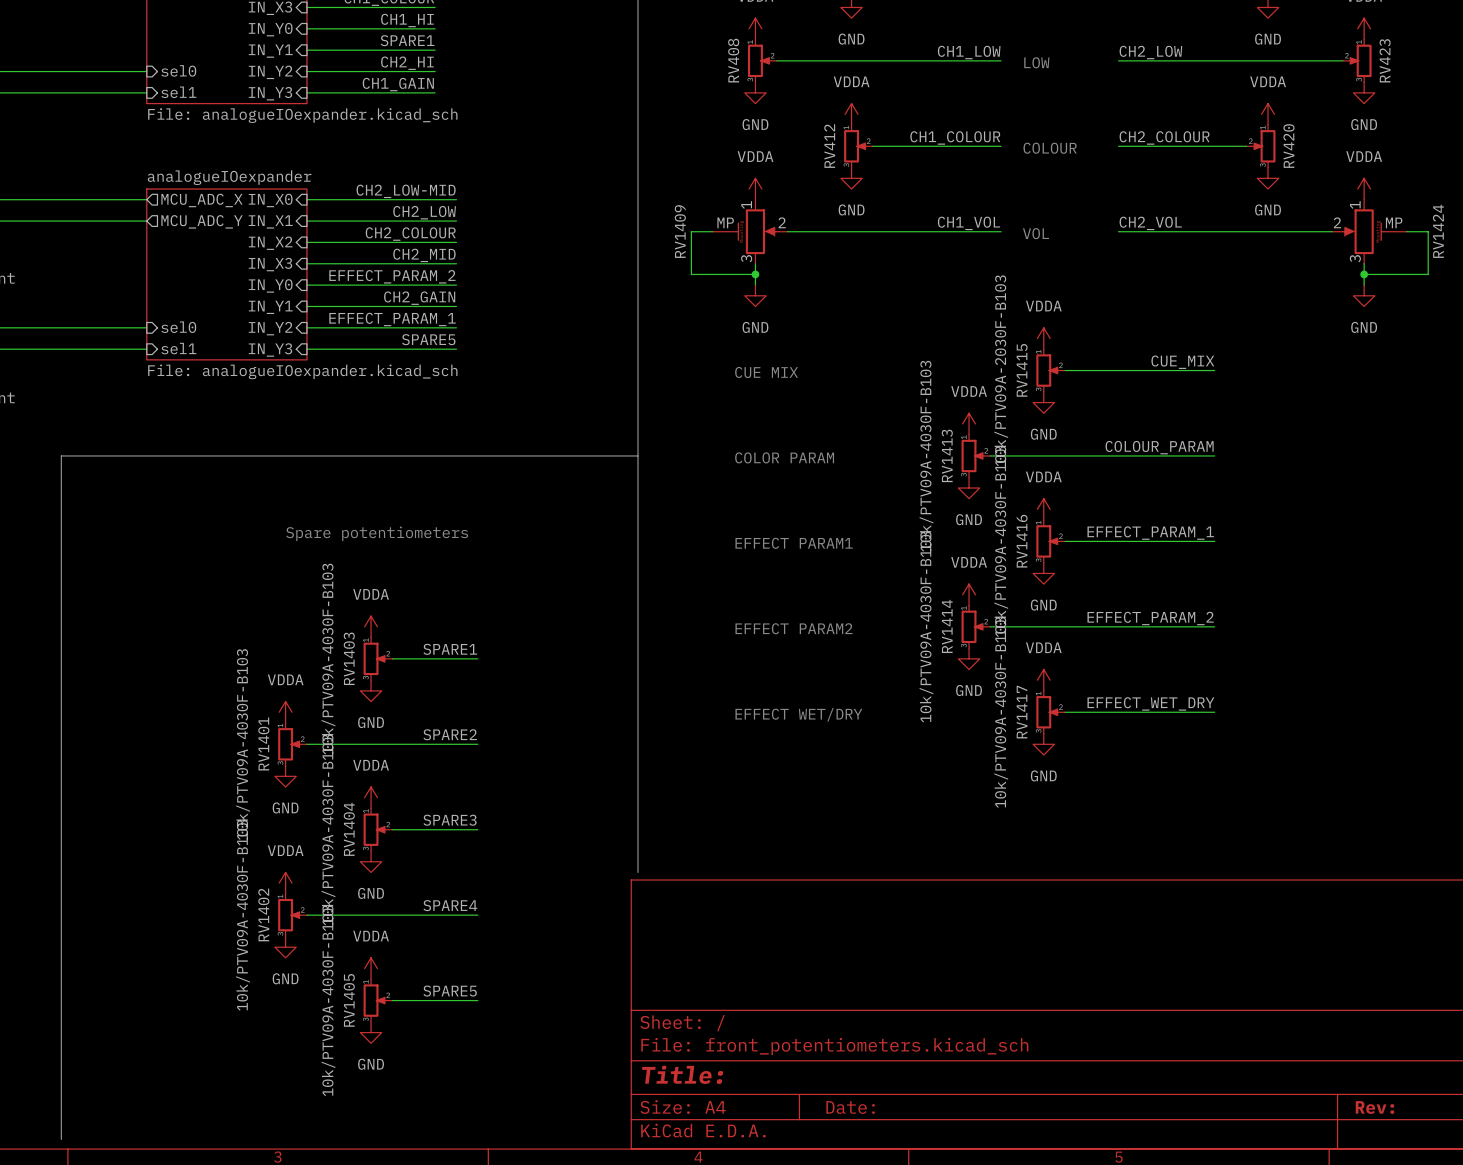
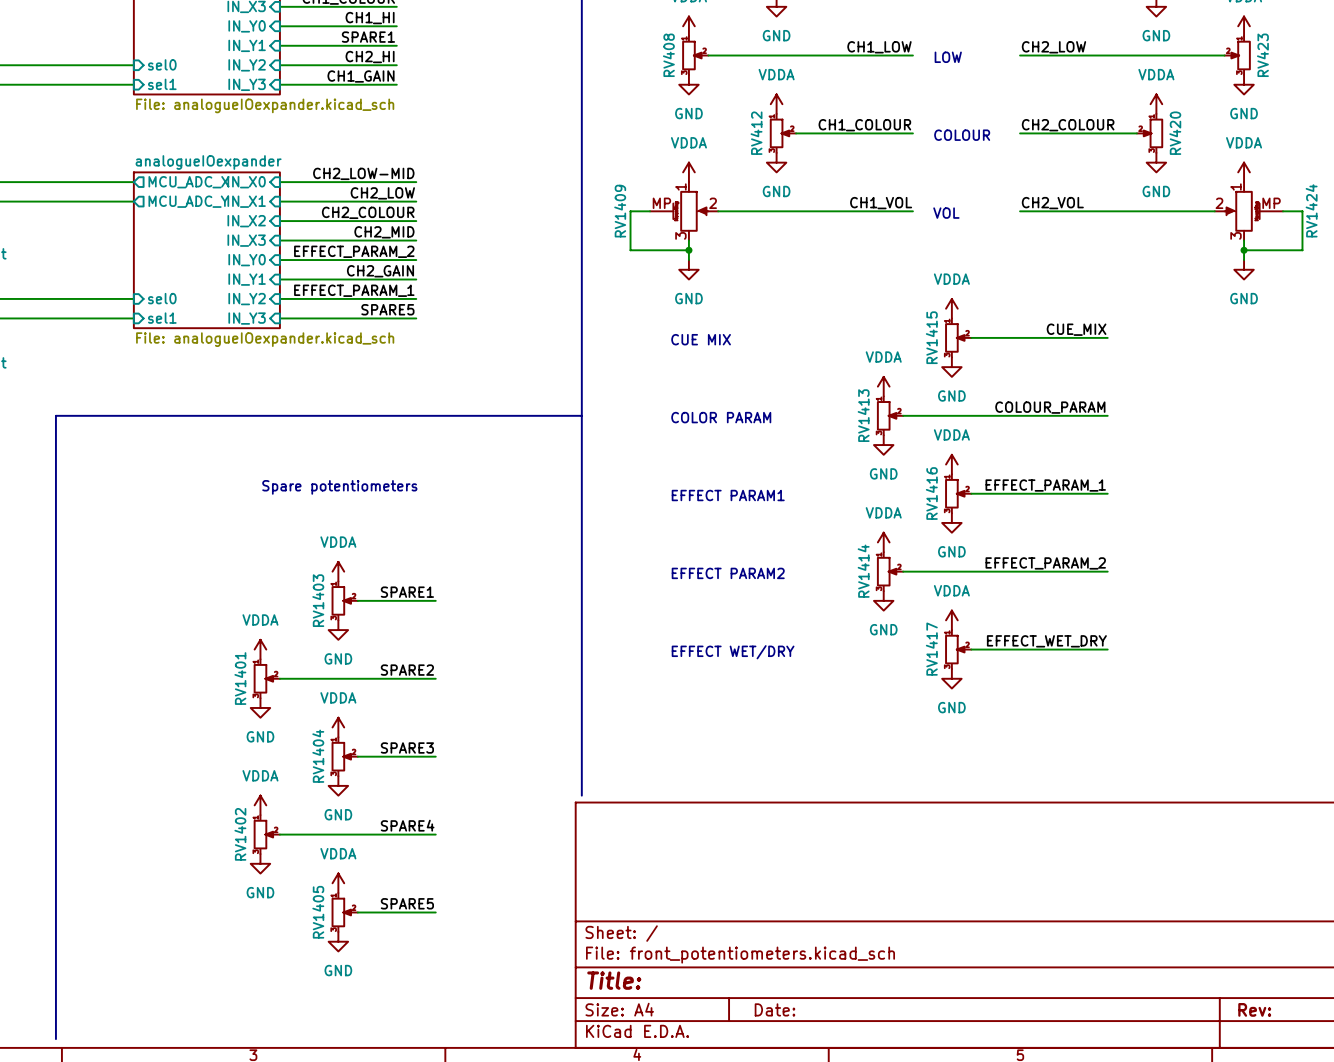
RV1415 value: 10k/PTV09A-2030F-B103 (1001, 370) -> none
RV1413 value: 10k/PTV09A-4030F-B103 (926, 456) -> none
RV1416 value: 10k/PTV09A-4030F-B103 (1001, 541) -> none
RV1414 value: 10k/PTV09A-4030F-B103 (926, 627) -> none
RV1403 value: 10k/PTV09A-4030F-B103 (328, 659) -> none
RV1417 value: 10k/PTV09A-4030F-B103 (1001, 712) -> none
RV1401 value: 10k/PTV09A-4030F-B103 (243, 744) -> none
RV1404 value: 10k/PTV09A-4030F-B103 (328, 829) -> none
RV1402 value: 10k/PTV09A-4030F-B103 (243, 915) -> none
RV1405 value: 10k/PTV09A-4030F-B103 (328, 1000) -> none

